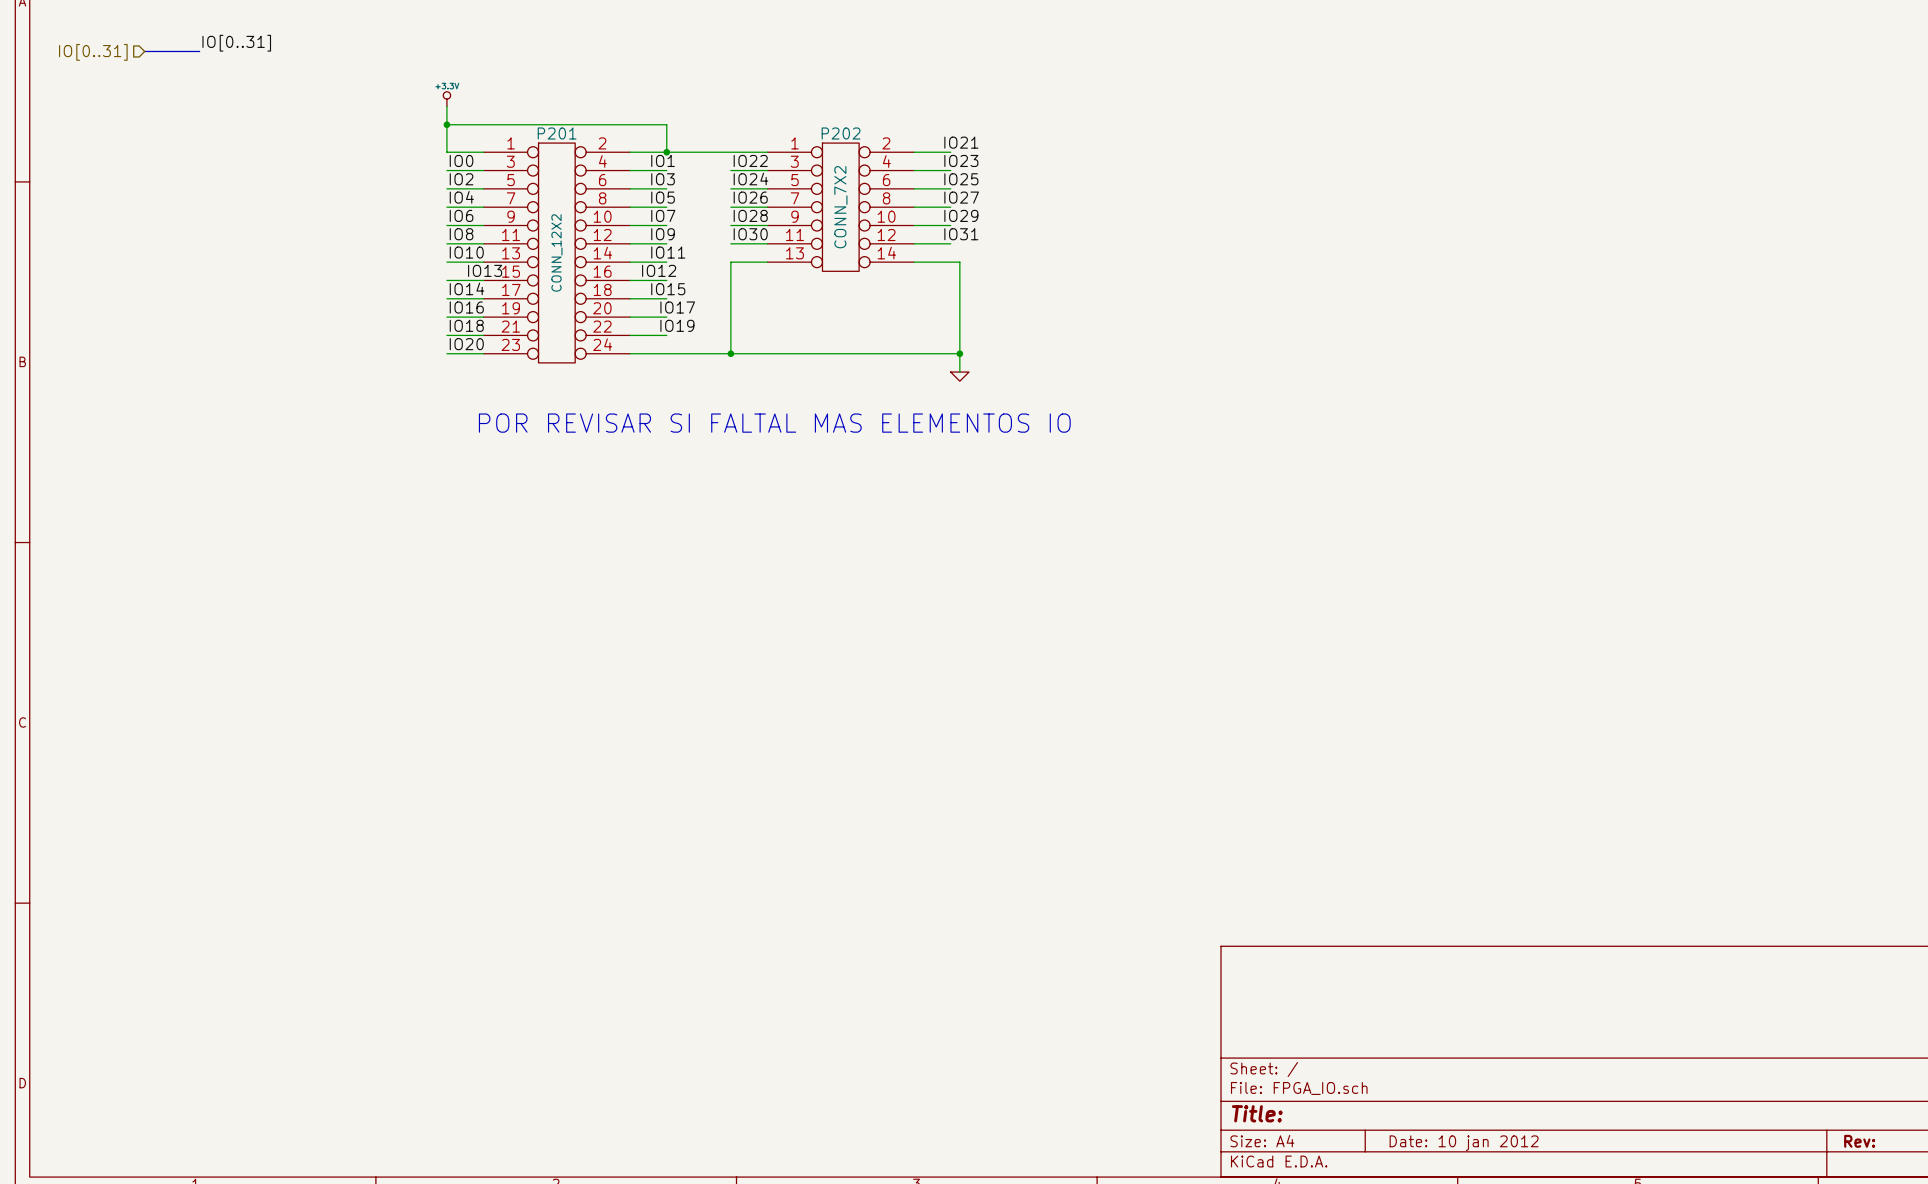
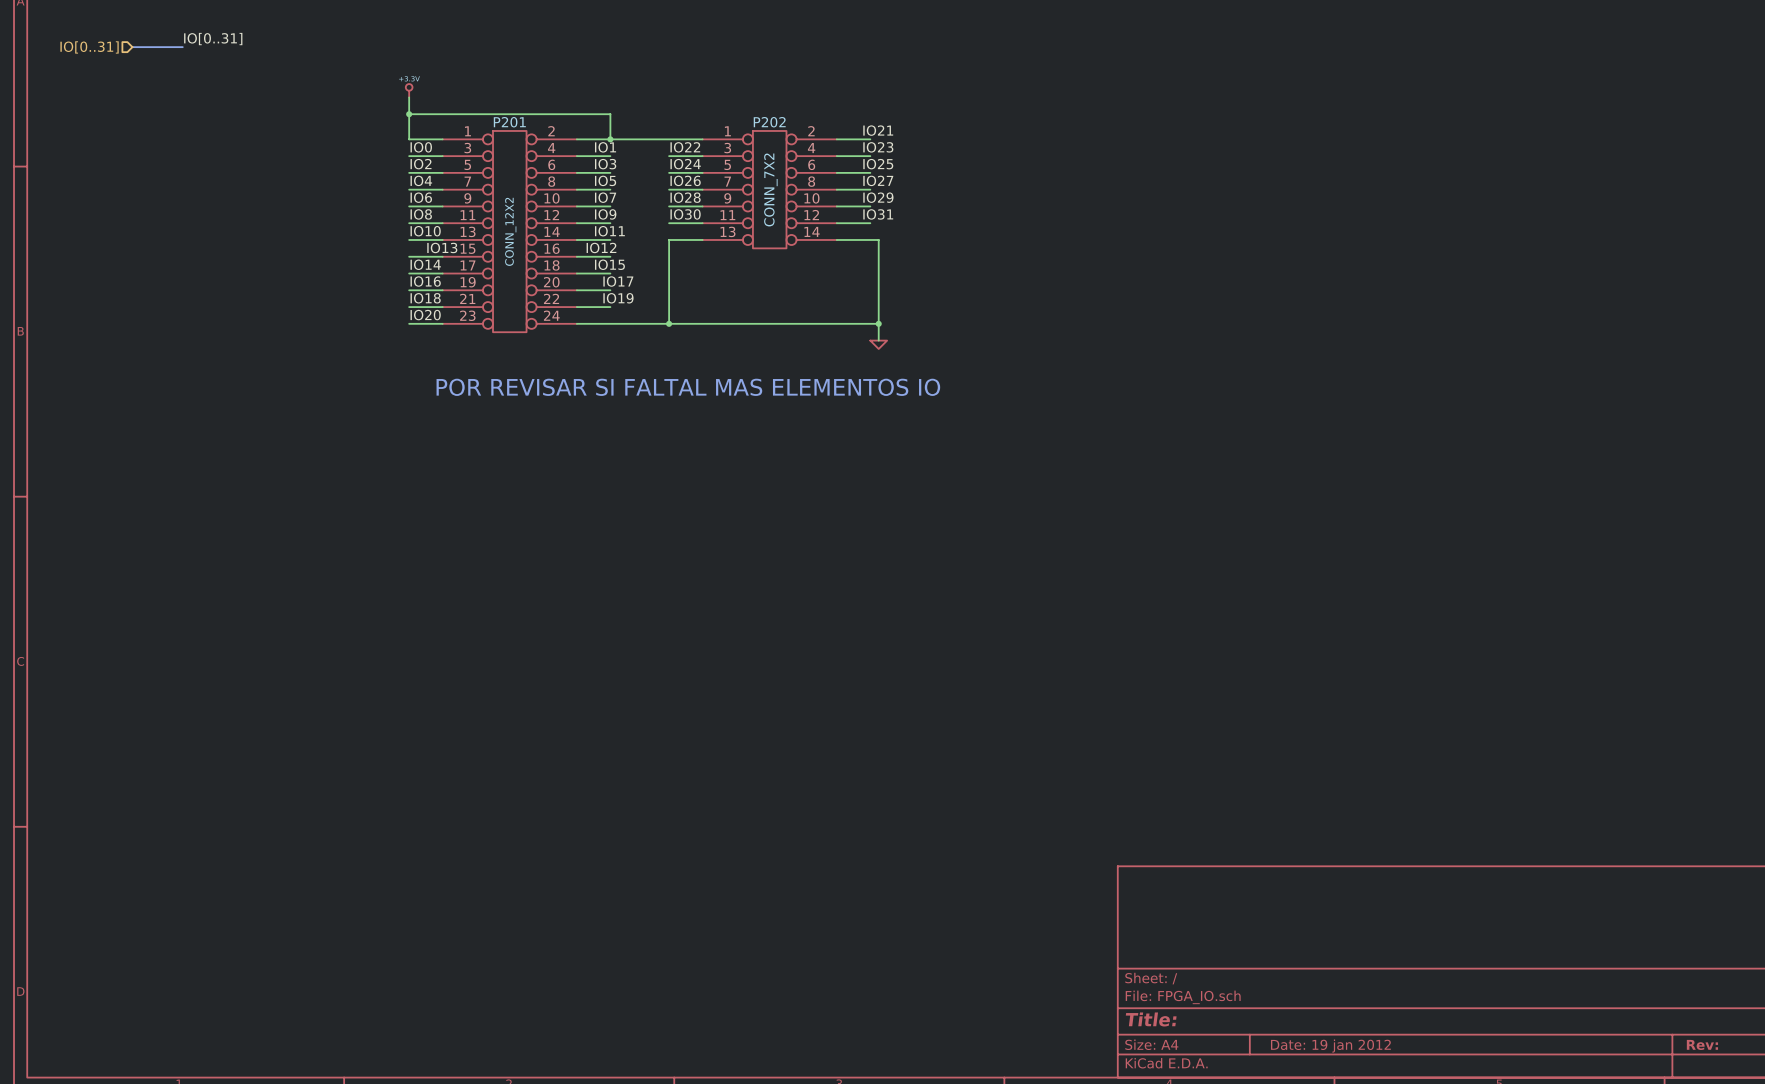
title block: Date: 10 jan 2012 (1464, 1143) -> Date: 19 jan 2012 (1330, 1046)

